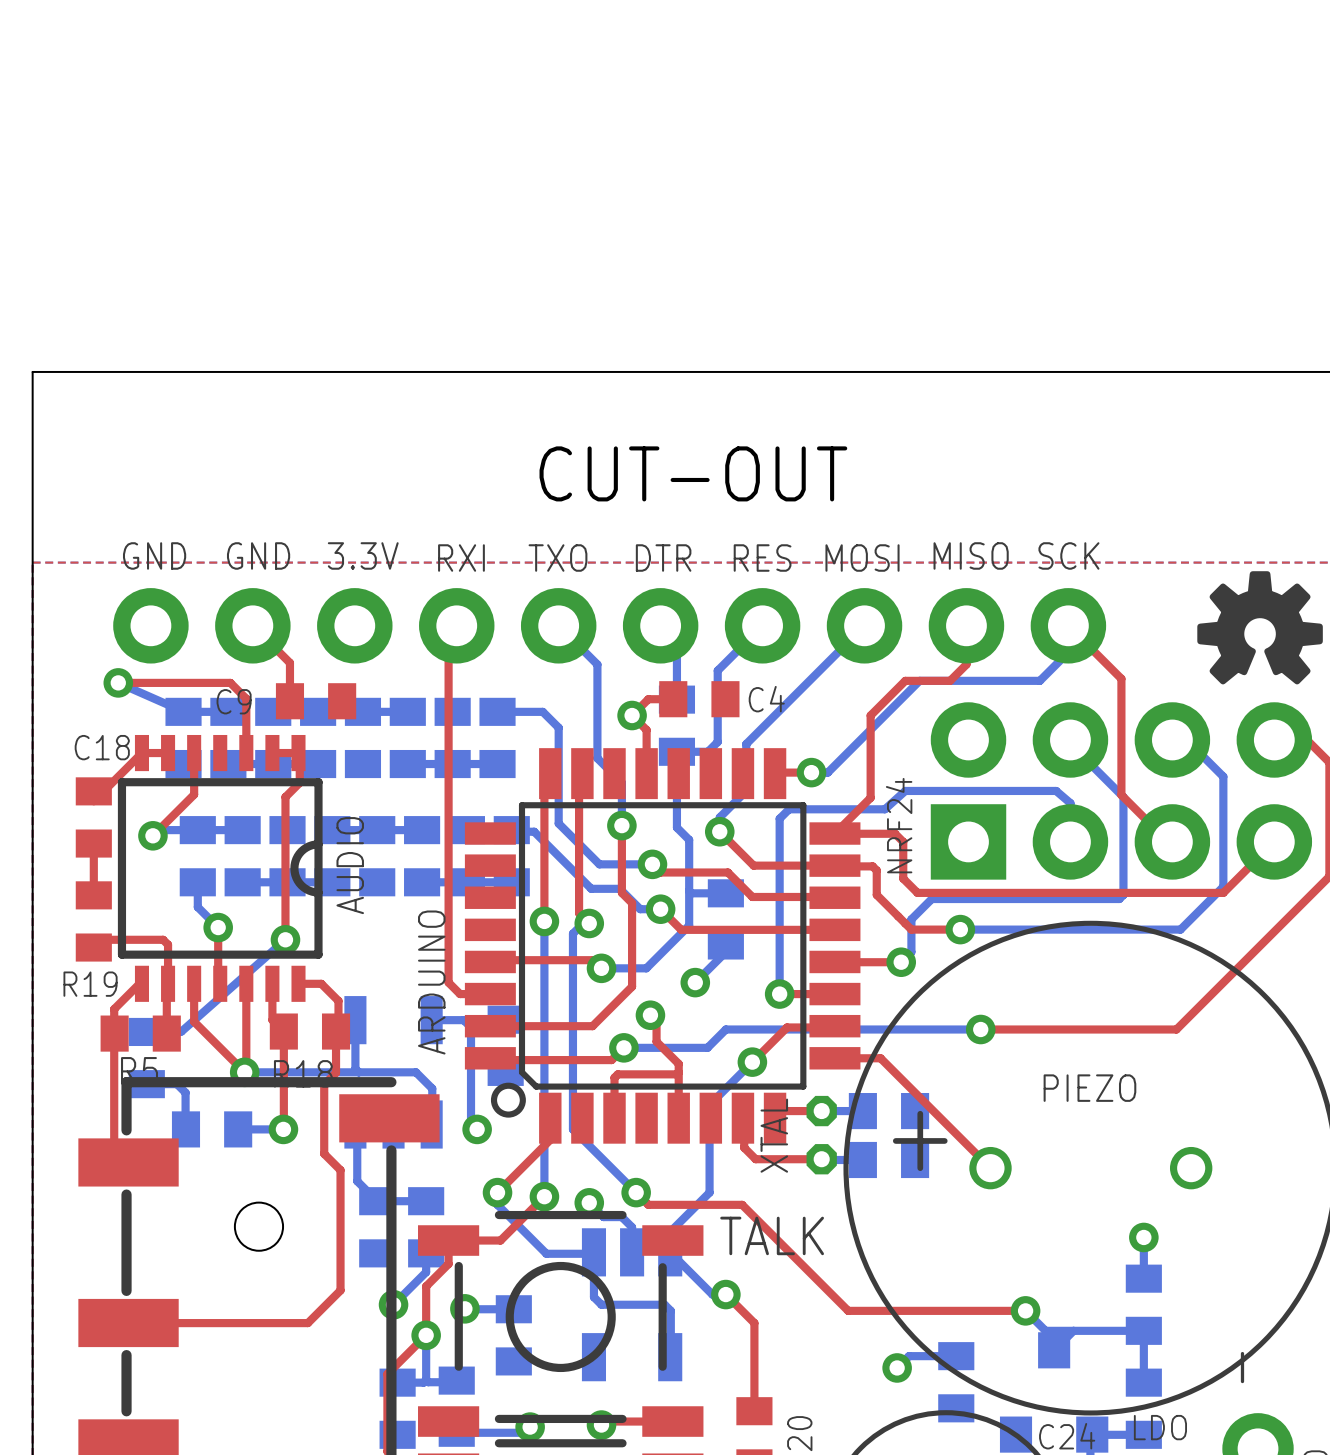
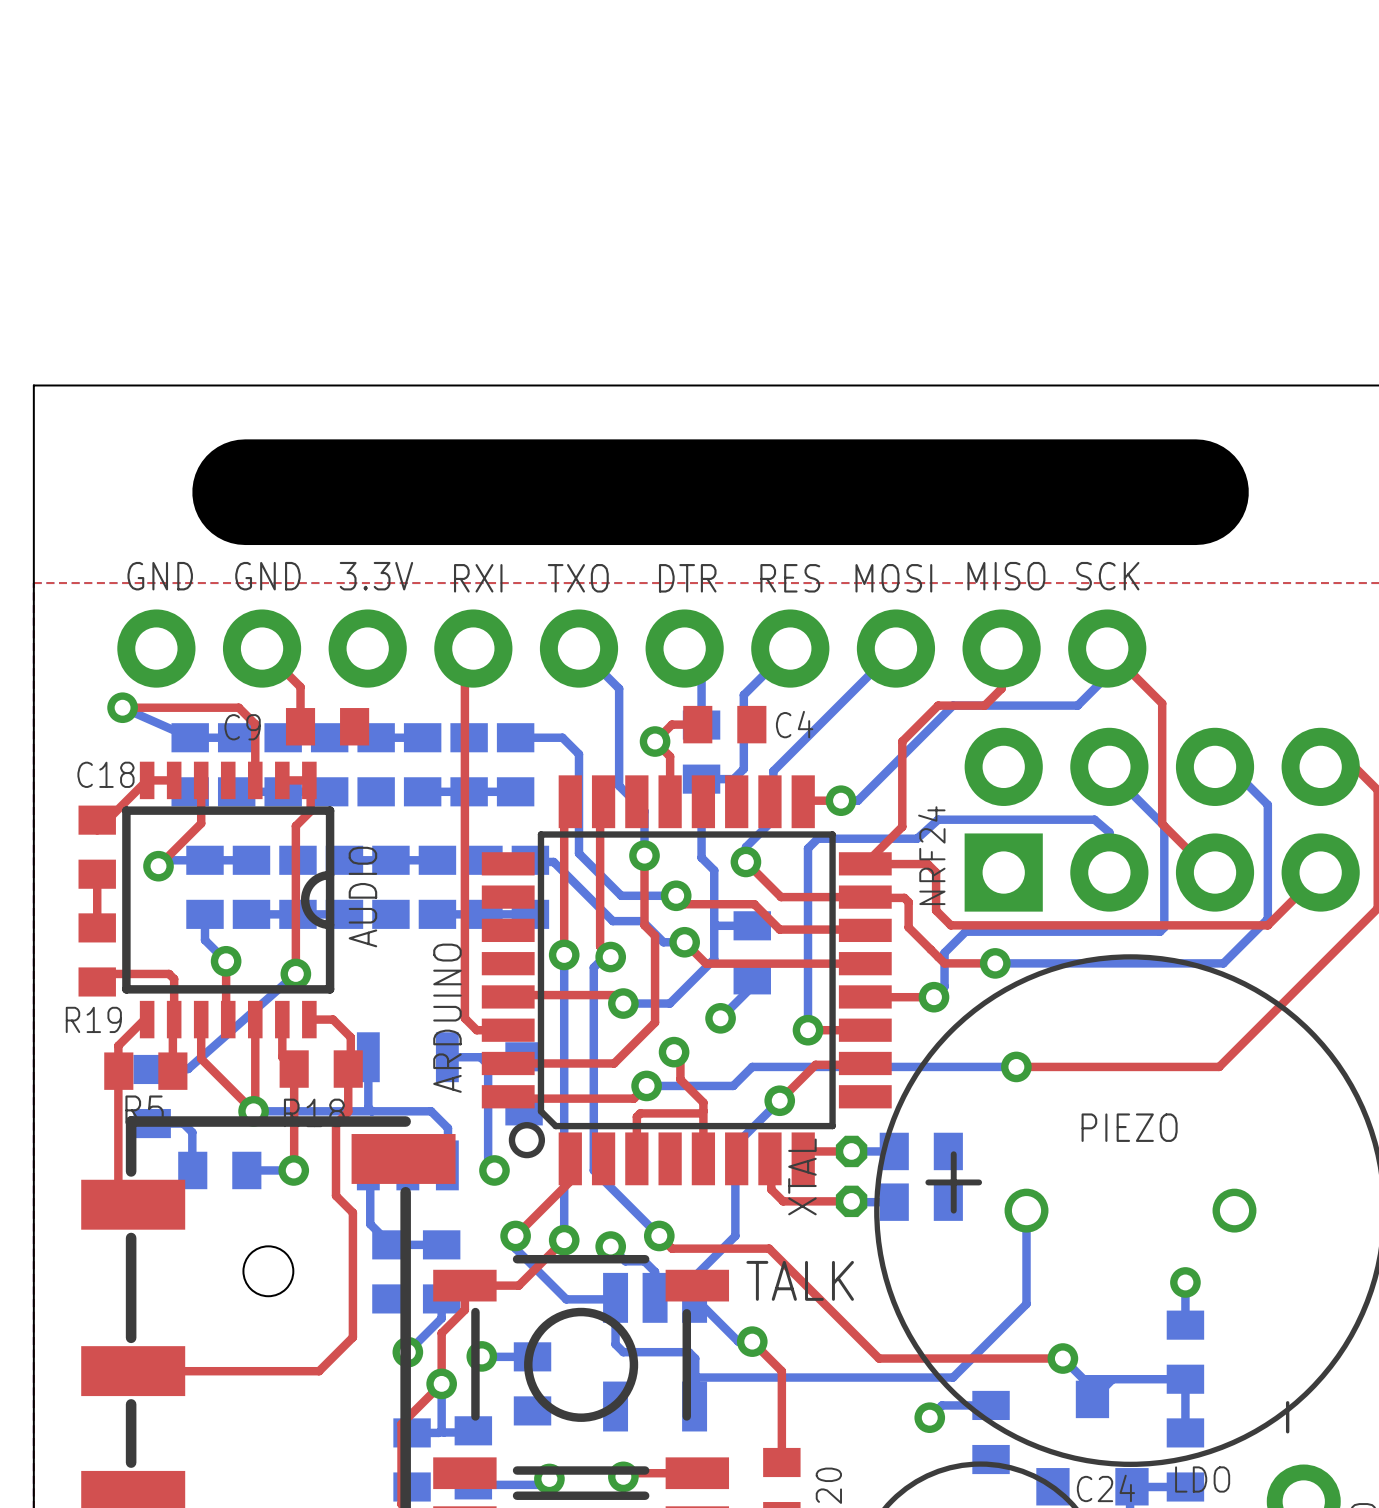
board edge: none -> (245, 492) (1196, 492)
drawing: [1197, 571, 1323, 685] -> none
top track: (834, 1058) (880, 1058) (990, 1168) -> none
bottom track: none -> (1026, 1210) (1026, 1304) (953, 1377) (695, 1377)

